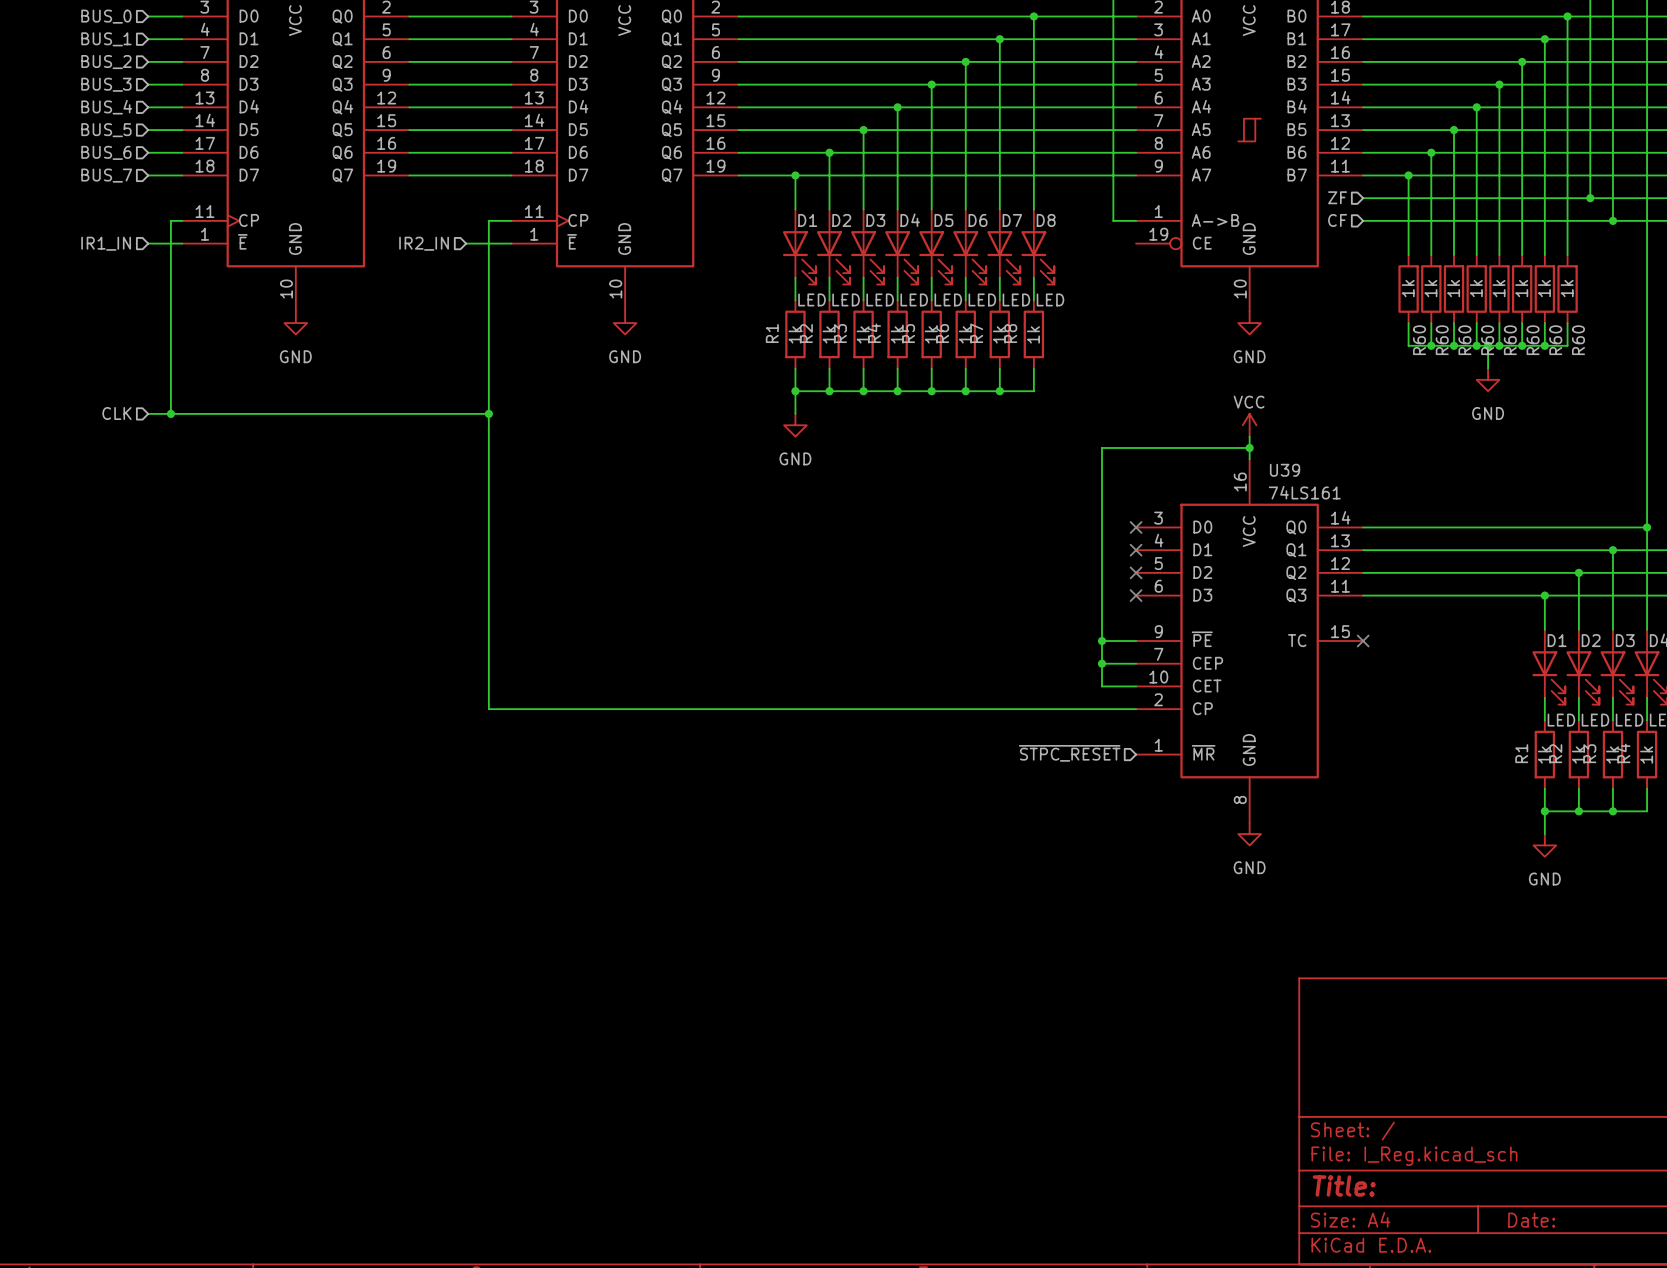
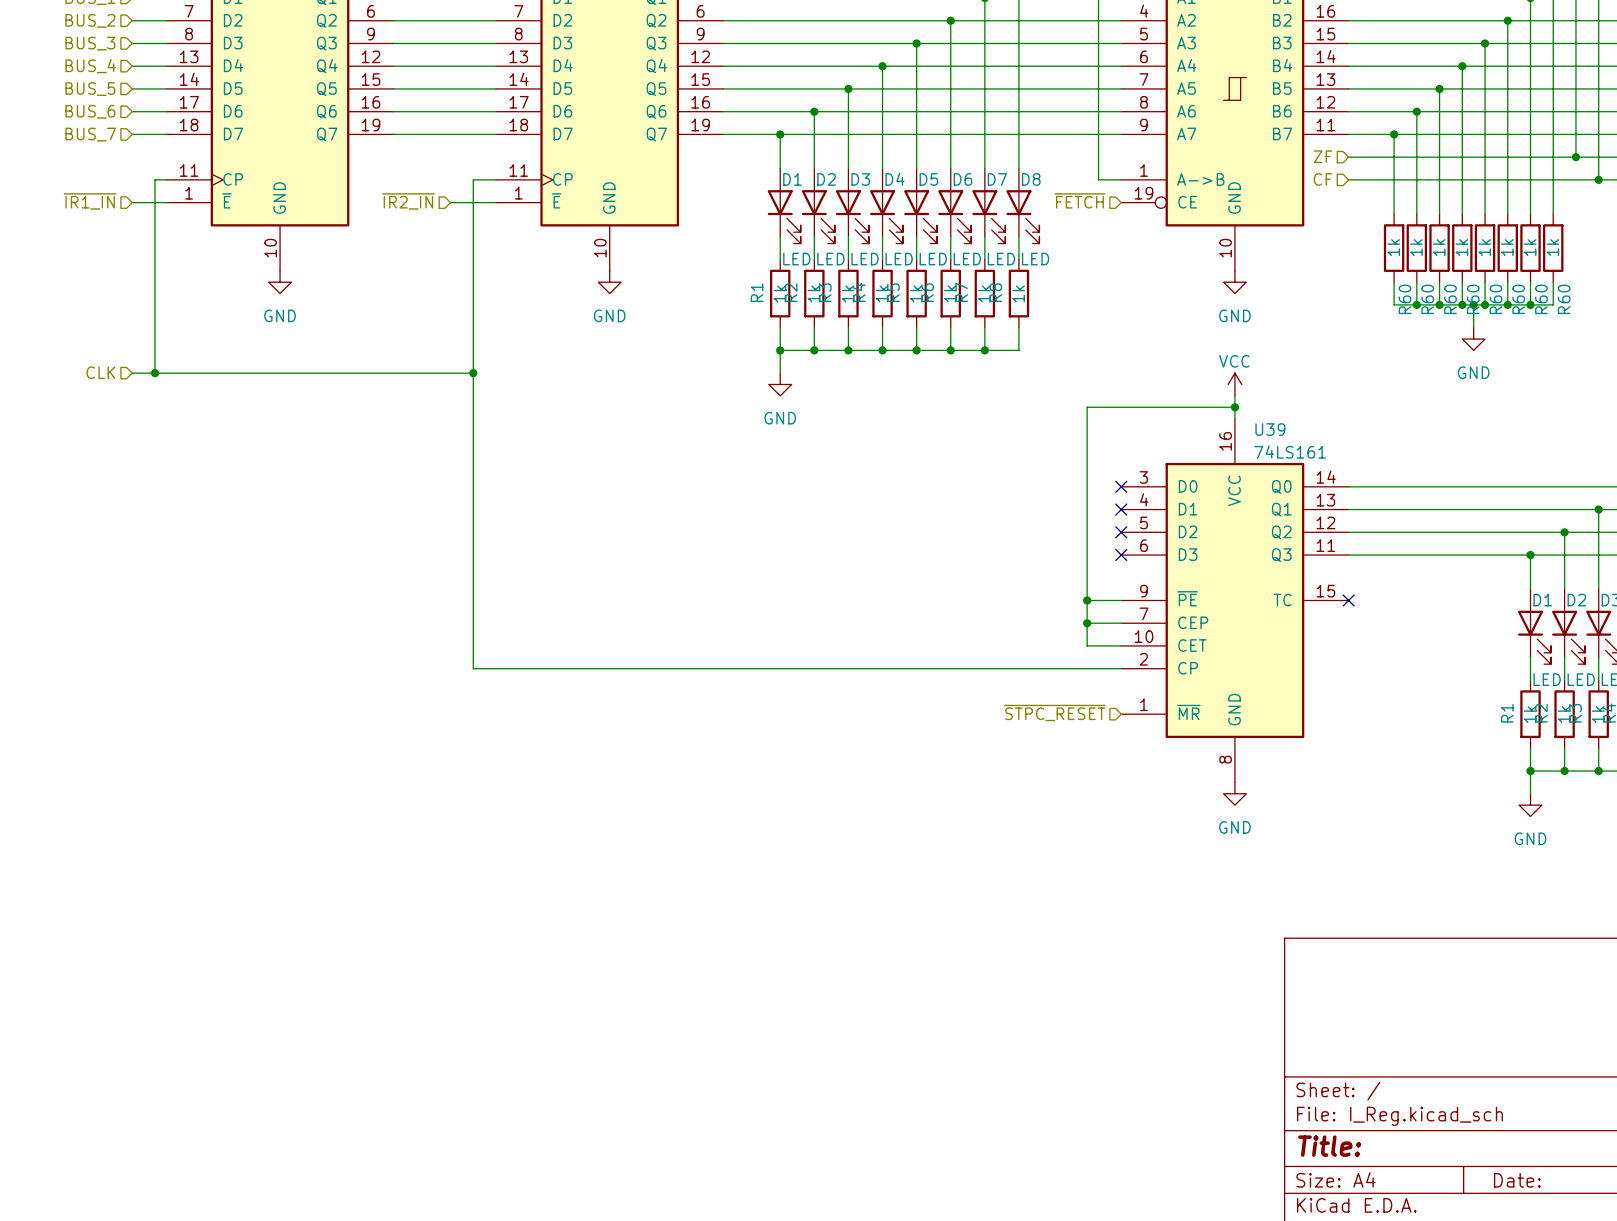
hierarchical label: none -> ~{FETCH} (1079, 200)
hierarchical label: IR1_IN (106, 243) -> ~{IR1_IN} (90, 201)
hierarchical label: IR2_IN (424, 243) -> ~{IR2_IN} (408, 201)

